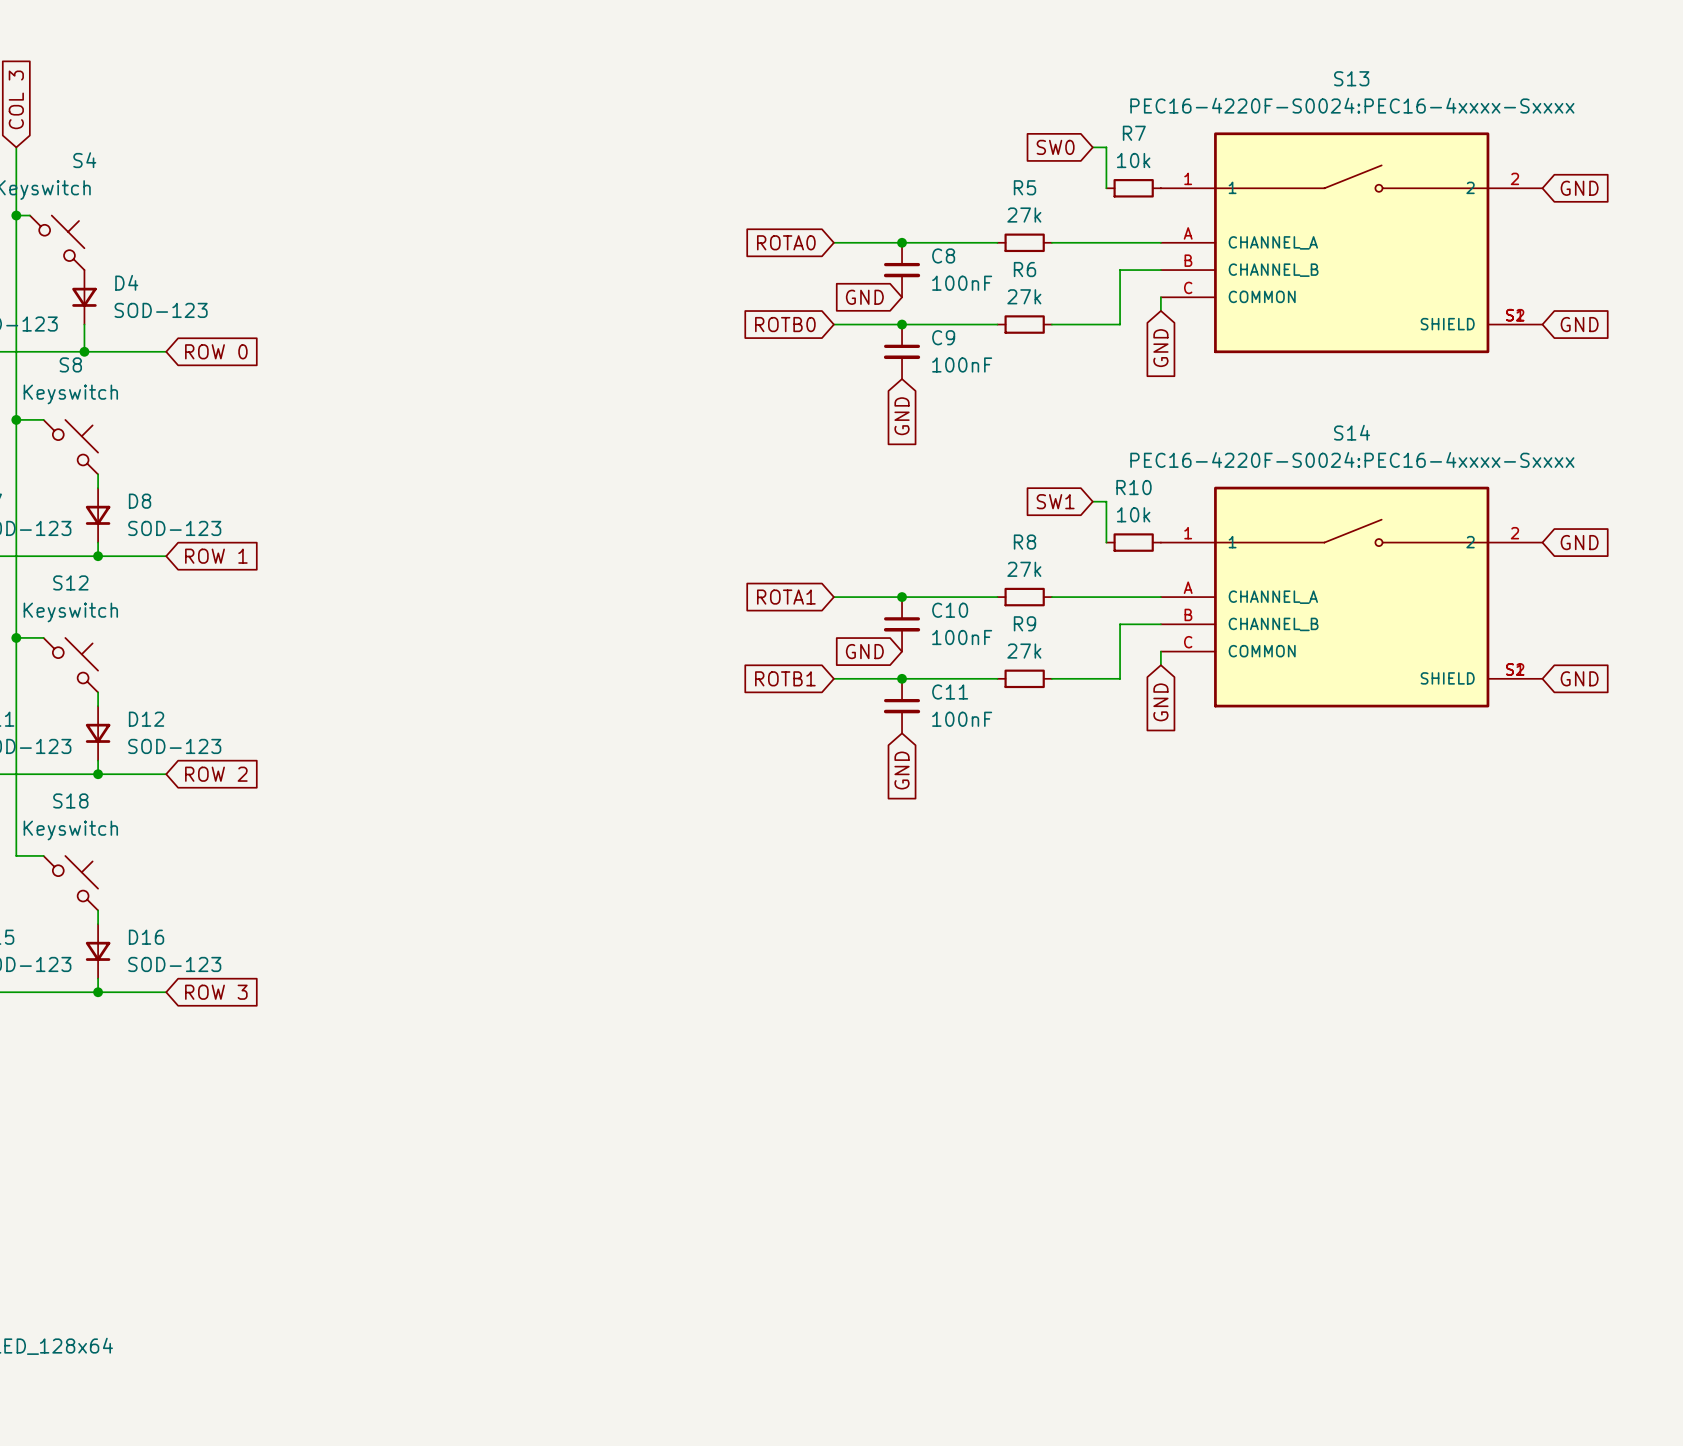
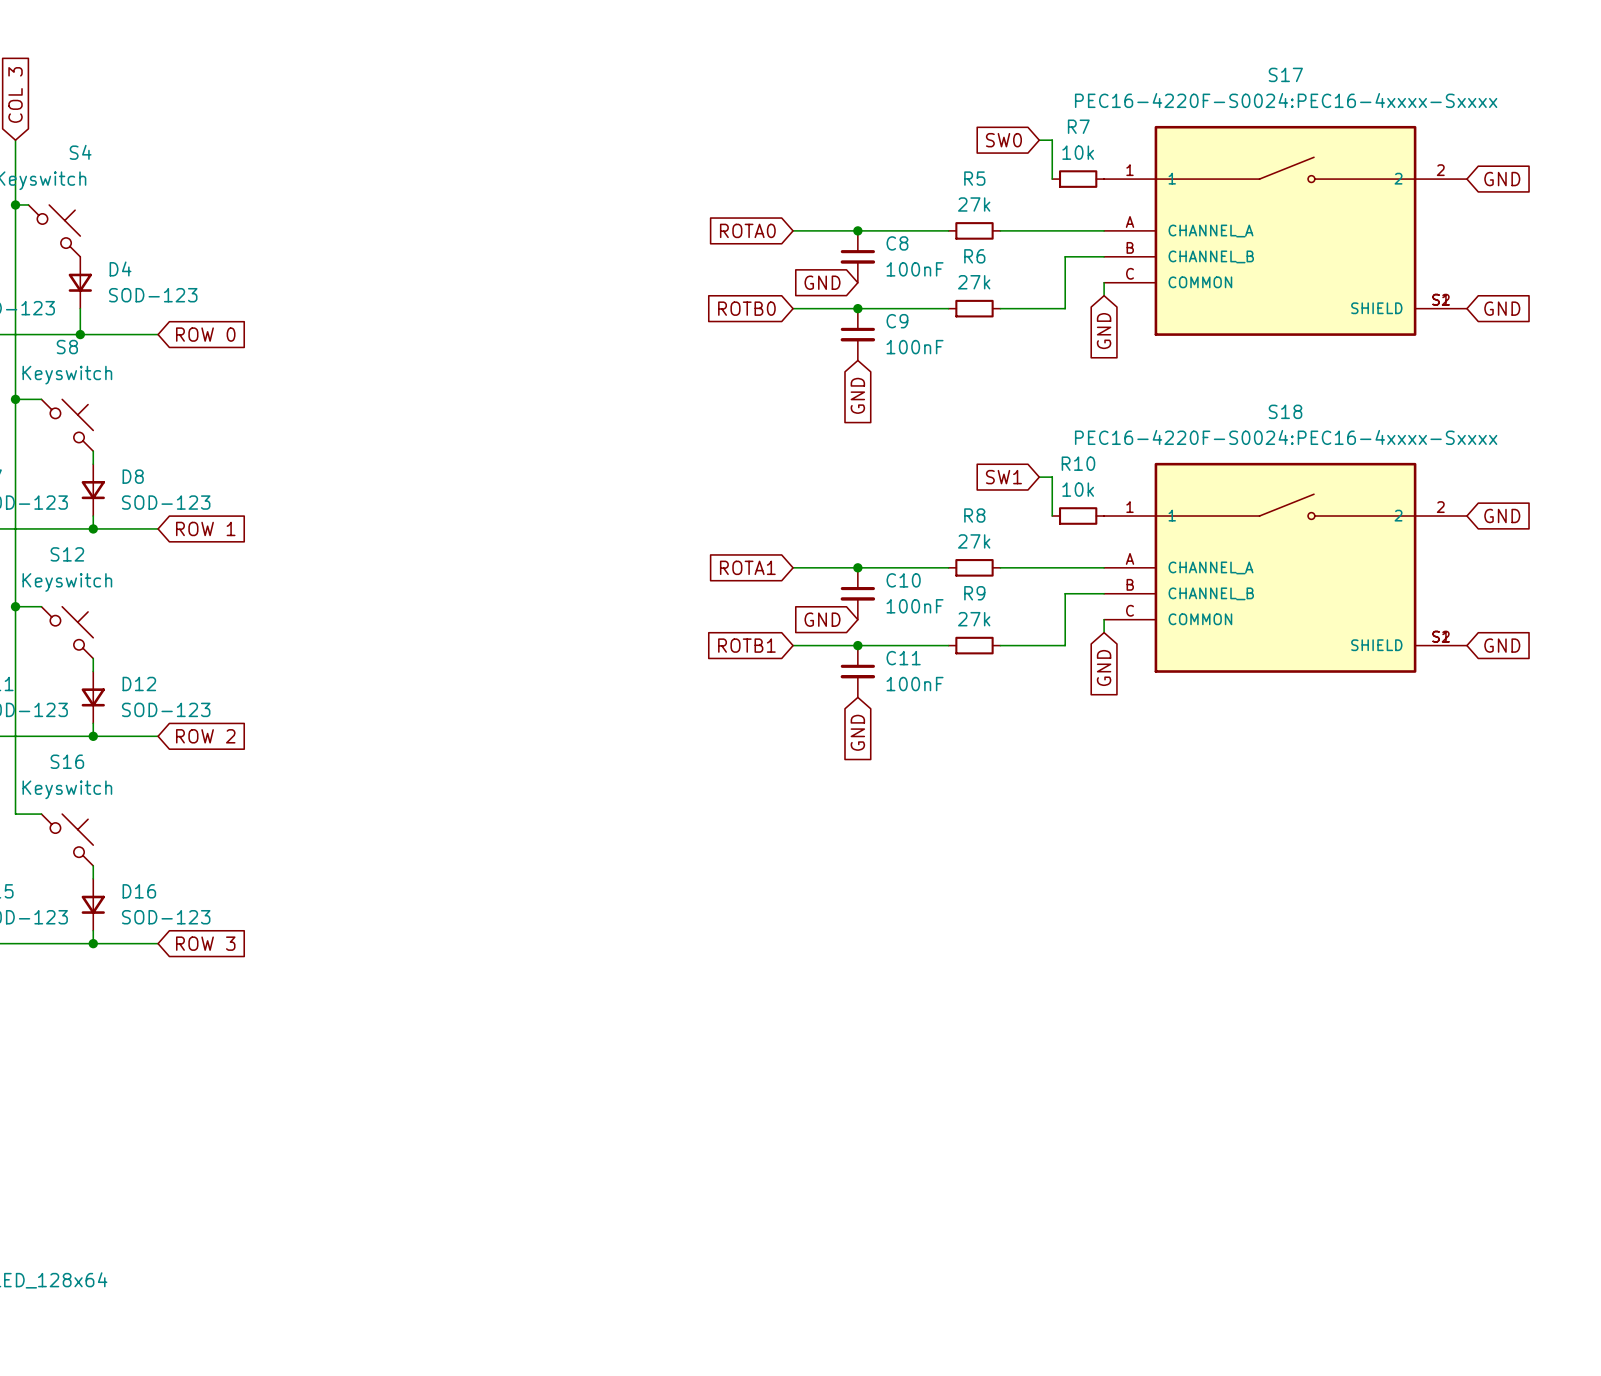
S13 name: S13 (1351, 78) -> S17 (1285, 74)
S14 name: S14 (1352, 432) -> S18 (1285, 411)
S18 name: S18 (70, 800) -> S16 (67, 761)

